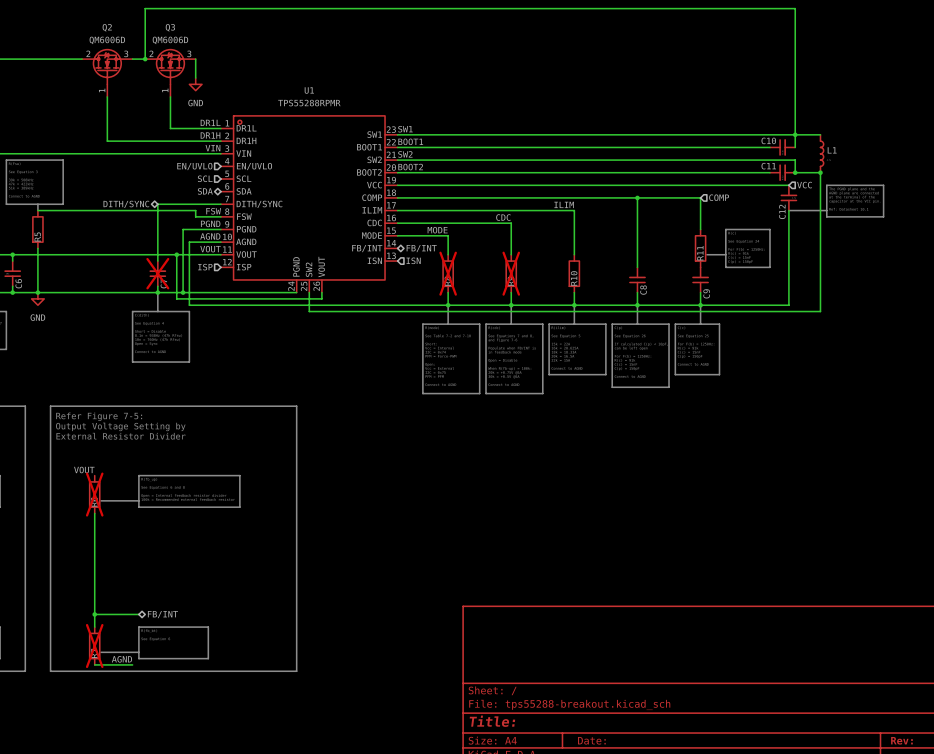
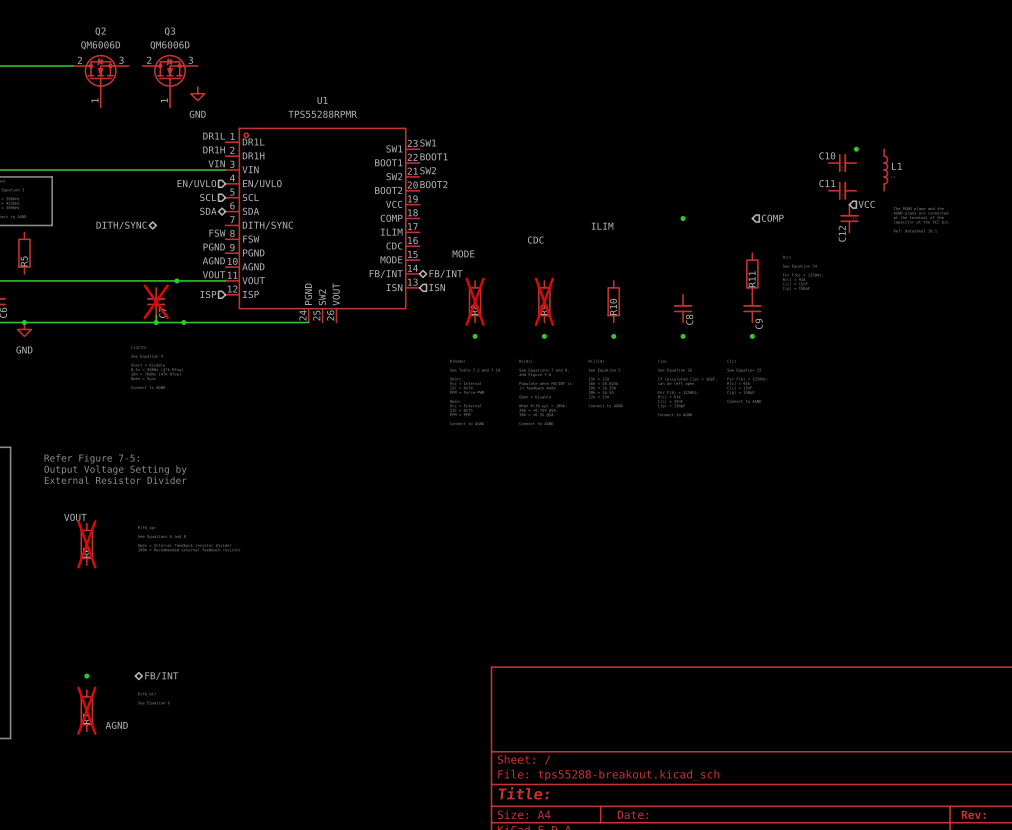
wire: (132, 59) (145, 59) (145, 8) (795, 8) (795, 147) -> none
junction: (145, 59) -> none
wire: (195, 59) (195, 78) -> none
wire: (107, 96) (107, 141) (220, 141) -> none
wire: (170, 96) (170, 128) (220, 128) -> none
wire: (397, 134) (820, 134) -> none
wire: (397, 147) (769, 147) -> none
wire: (397, 160) (795, 160) (795, 172) (820, 172) (820, 311) (309, 311) (309, 292) -> none
wire: (397, 172) (769, 172) -> none
junction: (795, 172) -> none
junction: (820, 172) -> none
wire: (397, 185) (788, 185) -> none
line: (826, 185) (883, 185) (883, 216) (826, 216) (826, 185) -> none
wire: (397, 197) (700, 197) (700, 229) -> none
wire: (637, 197) (637, 267) -> none
line: (37, 204) (37, 210) -> none
wire: (220, 204) (157, 204) (157, 261) -> none
wire: (37, 210) (195, 210) (195, 216) (220, 216) -> none
wire: (397, 210) (574, 210) (574, 254) -> none
wire: (788, 210) (788, 305) (189, 305) (189, 242) (220, 242) -> none
line: (788, 210) (826, 210) -> none
wire: (397, 223) (511, 223) (511, 254) -> none
wire: (220, 229) (183, 229) (183, 292) -> none
line: (725, 229) (769, 229) (769, 267) (725, 267) (725, 229) -> none
wire: (397, 235) (448, 235) (448, 254) -> none
wire: (37, 248) (37, 292) -> none
wire: (176, 254) (176, 298) (321, 298) (321, 292) -> none
line: (706, 254) (725, 254) -> none
line: (157, 292) (157, 311) -> none
wire: (448, 292) (448, 305) -> none
wire: (511, 292) (511, 305) -> none
wire: (574, 292) (574, 305) -> none
wire: (637, 292) (637, 305) -> none
wire: (700, 292) (700, 305) -> none
line: (448, 305) (448, 324) -> none
line: (511, 305) (511, 324) -> none
line: (574, 305) (574, 324) -> none
line: (637, 305) (637, 324) -> none
line: (700, 305) (700, 324) -> none
line: (132, 311) (189, 311) (189, 362) (132, 362) (132, 311) -> none
line: (422, 324) (479, 324) (479, 393) (422, 393) (422, 324) -> none
line: (486, 324) (542, 324) (542, 393) (486, 393) (486, 324) -> none
line: (549, 324) (605, 324) (605, 374) (549, 374) (549, 324) -> none
line: (612, 324) (669, 324) (669, 387) (612, 387) (612, 324) -> none
line: (675, 324) (719, 324) (719, 374) (675, 374) (675, 324) -> none
line: (50, 406) (296, 406) (296, 671) (50, 671) (50, 406) -> none
line: (138, 475) (239, 475) (239, 507) (138, 507) (138, 475) -> none
line: (101, 500) (138, 500) -> none
wire: (94, 513) (94, 627) -> none
wire: (94, 614) (138, 614) -> none
line: (138, 627) (138, 658) (208, 658) (208, 627) (138, 627) -> none
line: (101, 652) (138, 652) -> none
wire: (94, 664) (132, 664) -> none

